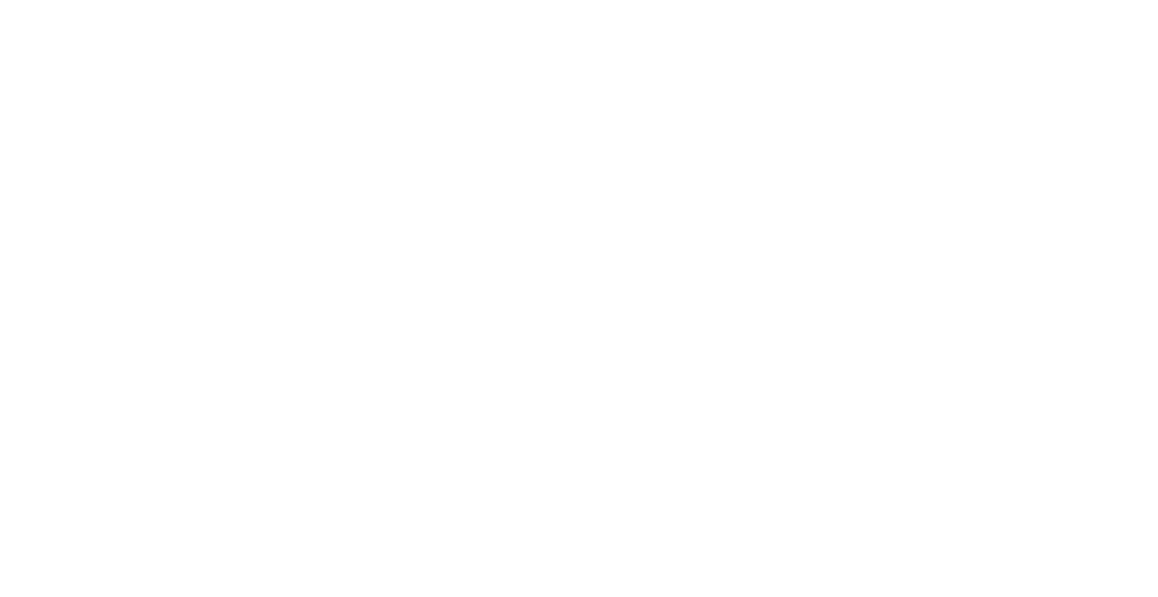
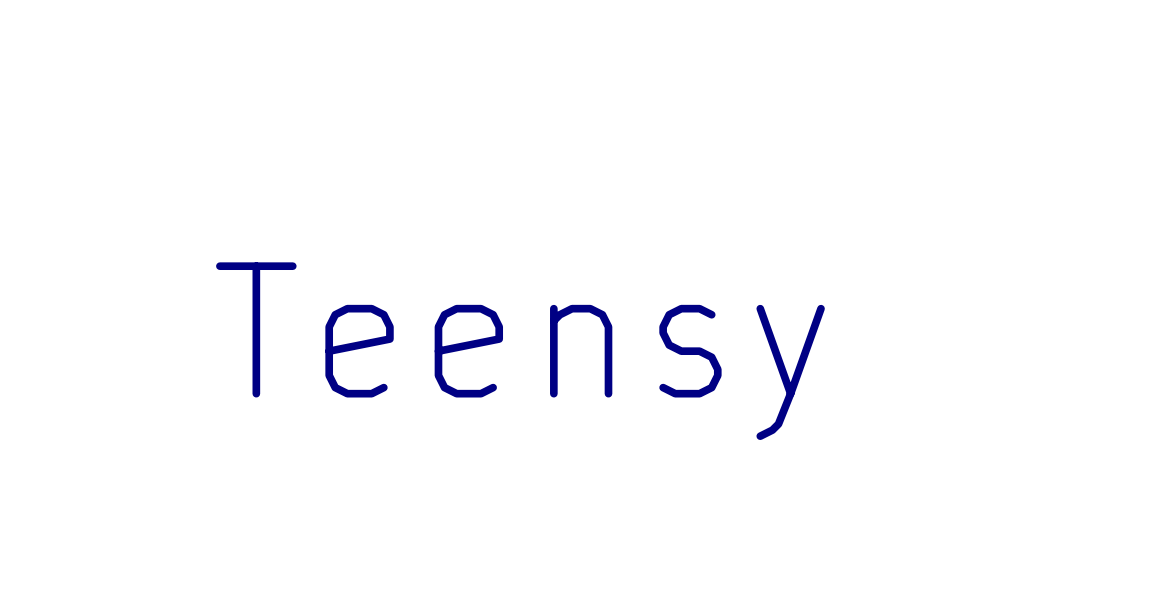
text: none -> Teensy (520, 351)

